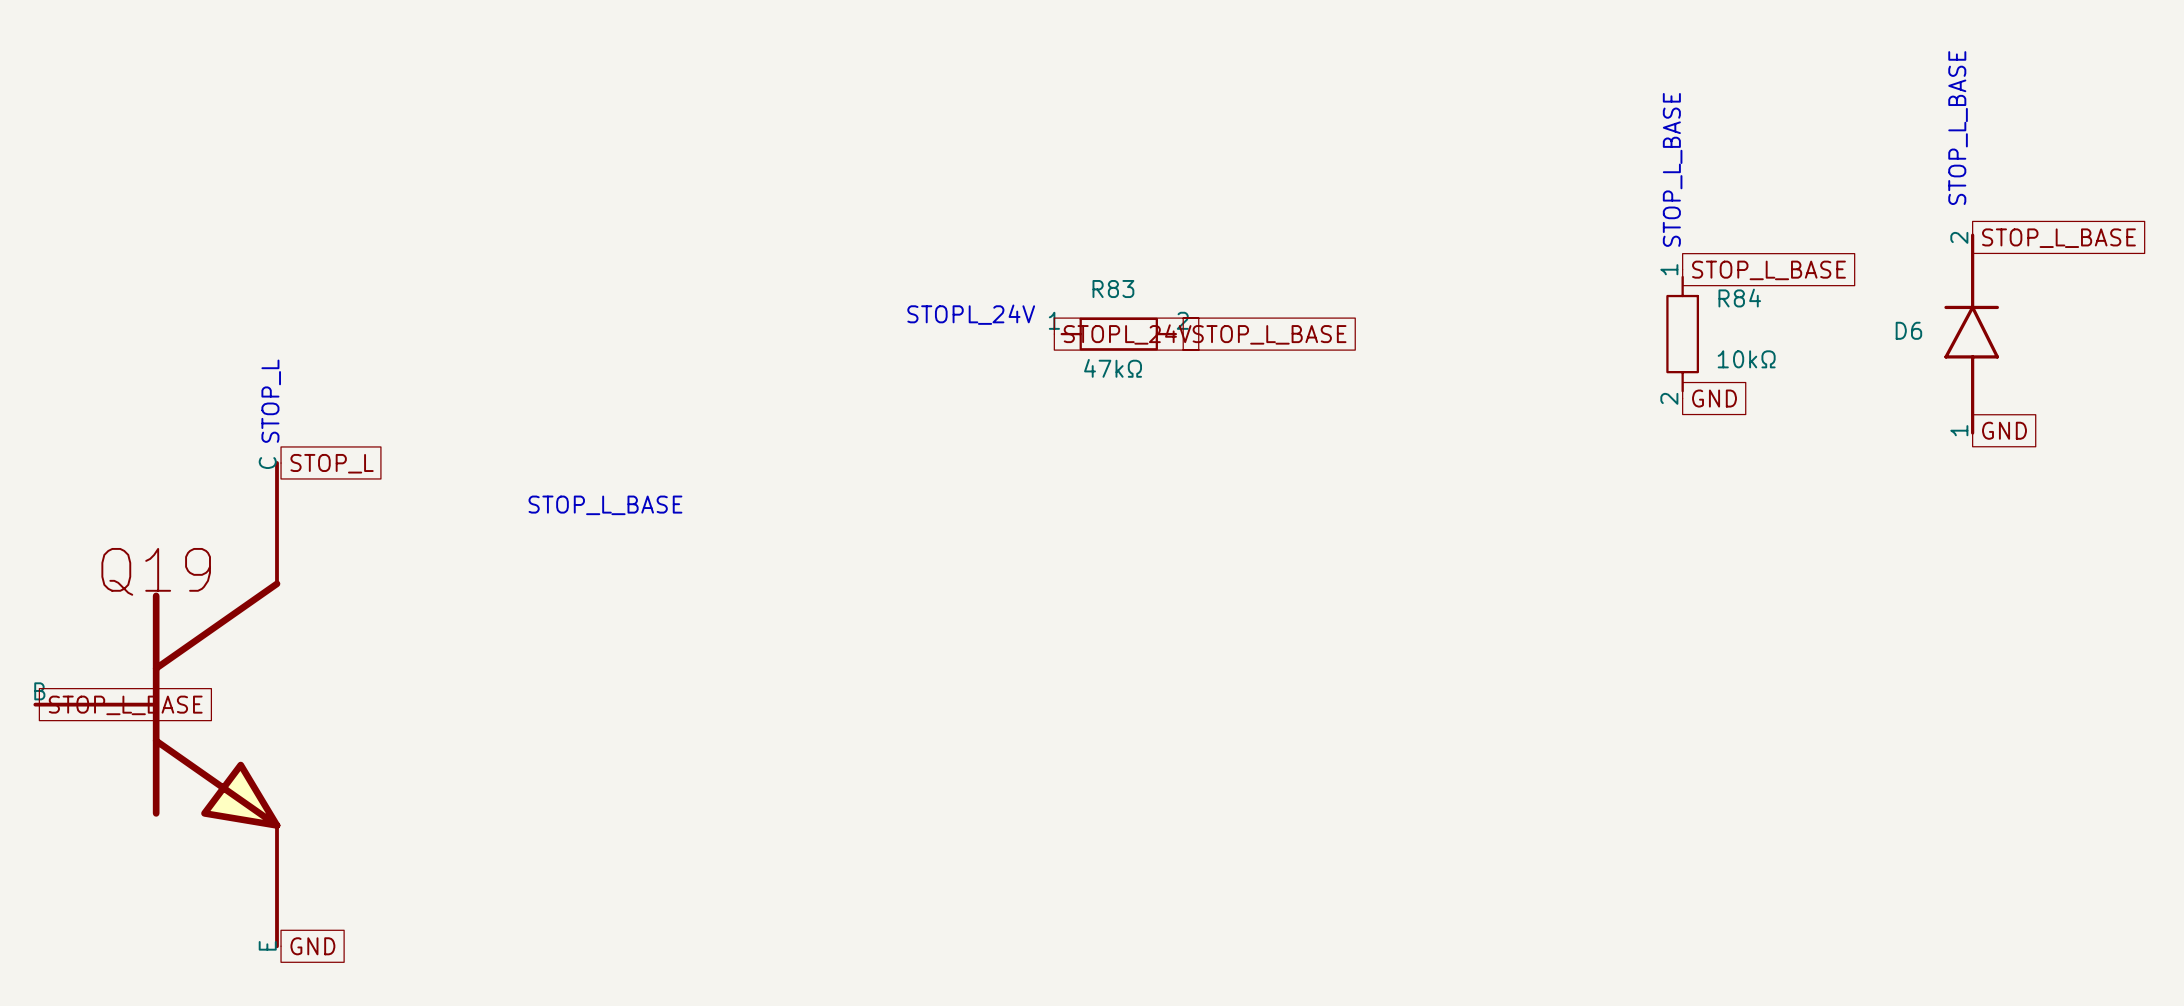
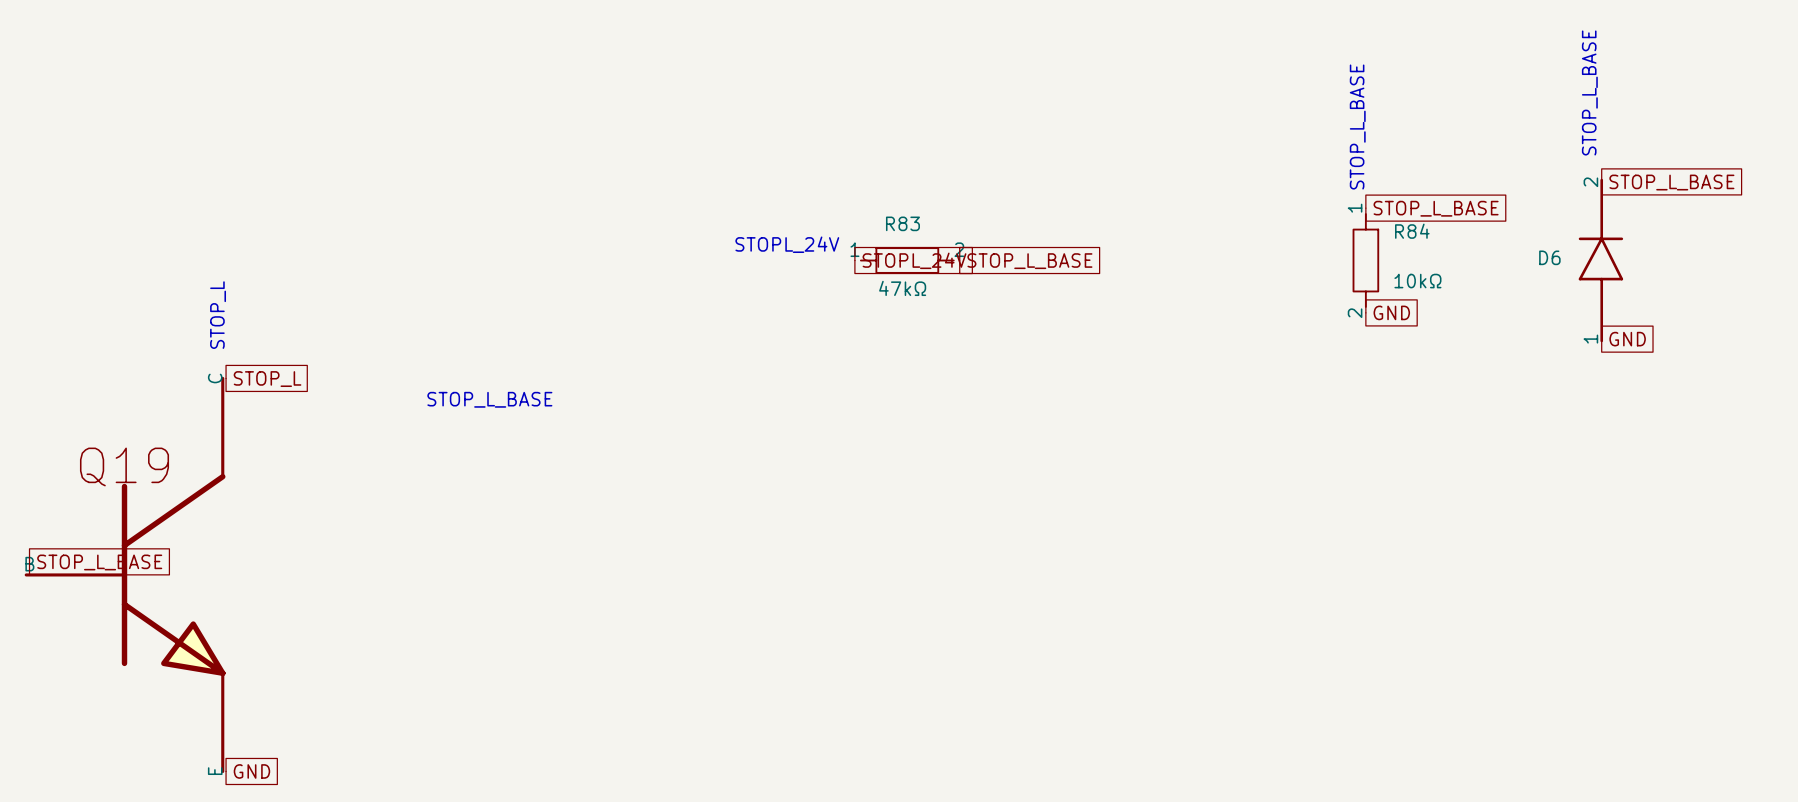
global label position: STOP_L (332, 463) -> STOP_L (267, 379)
part position: (157, 704) -> (125, 574)
global label position: GND (312, 946) -> GND (251, 771)

